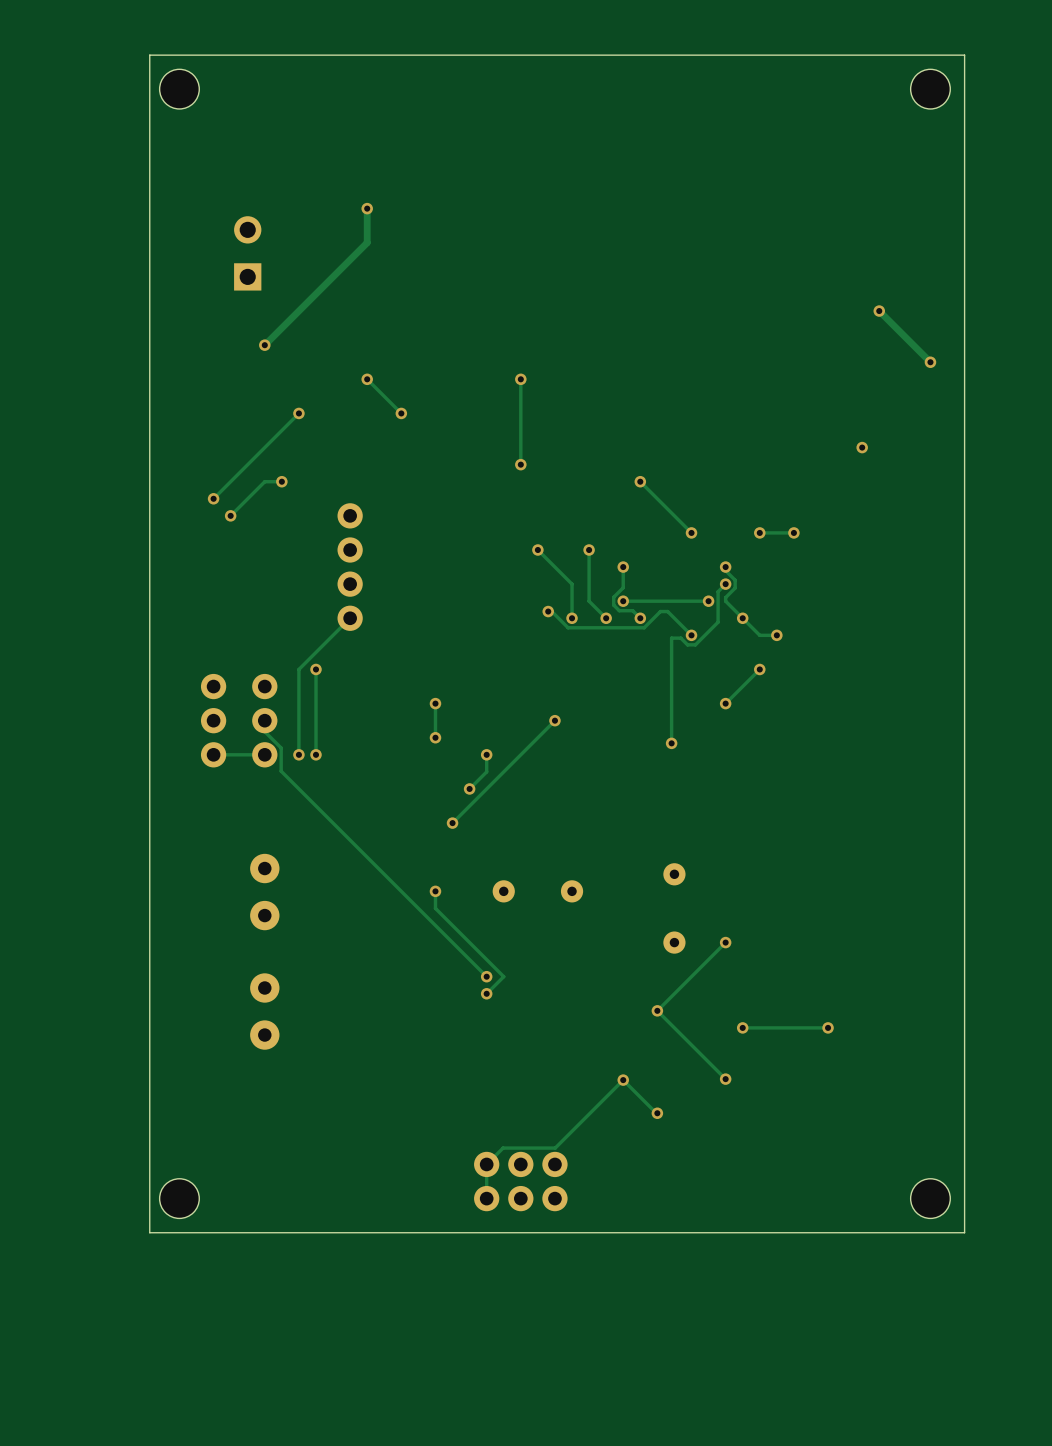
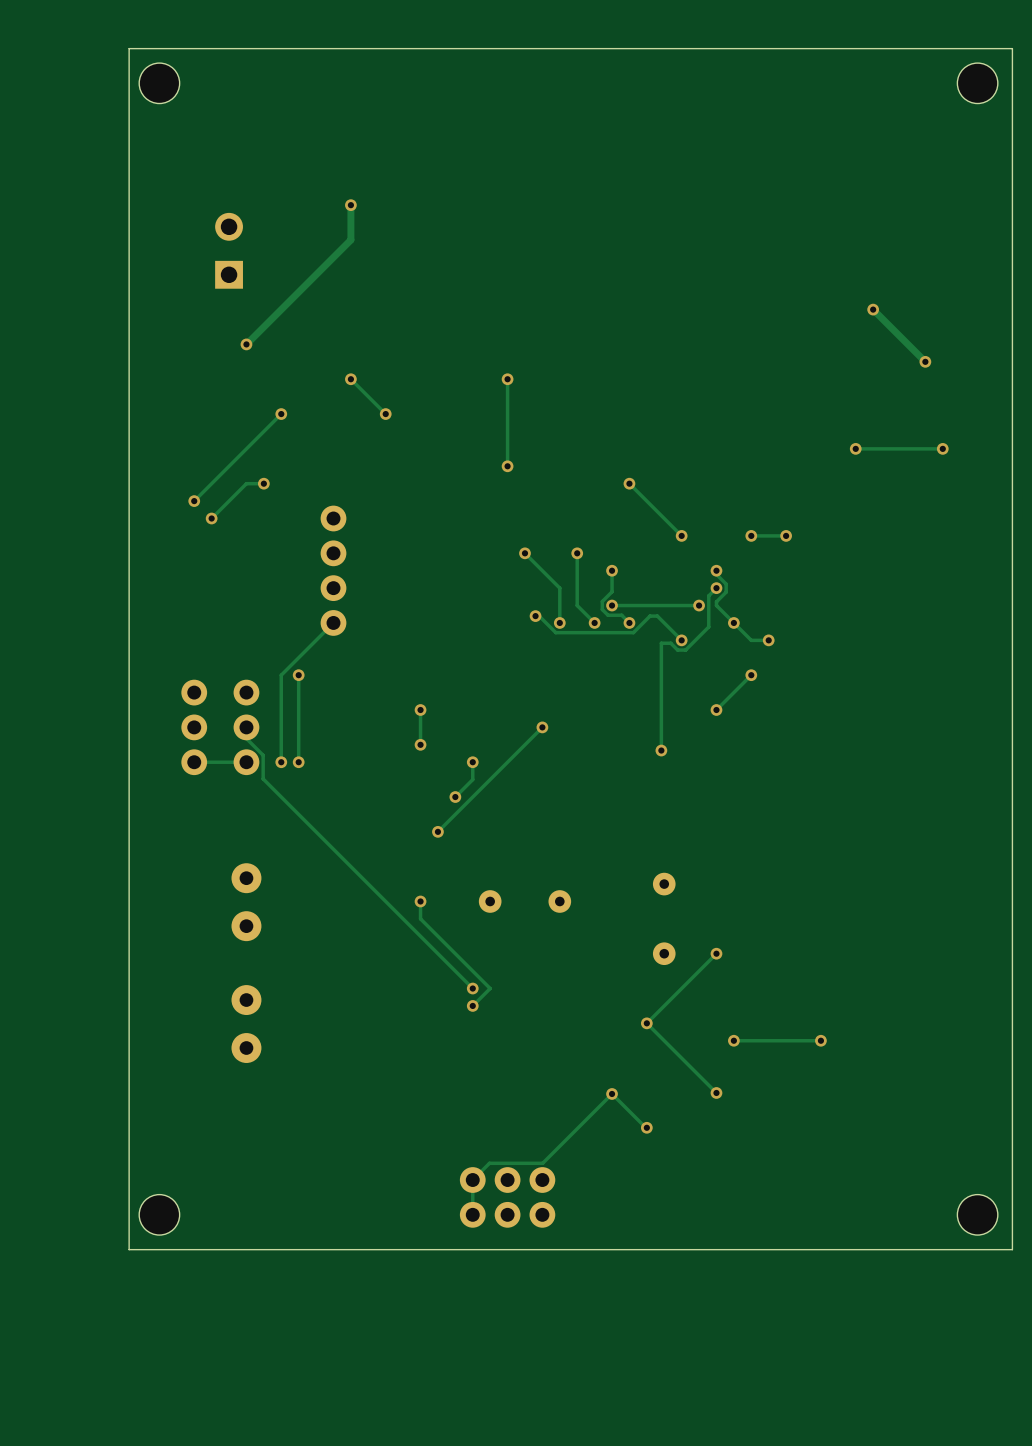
board edge: (964, 55) (964, 1232) -> (960, 48) (1012, 48) (1012, 1249) (960, 1249)
hole position: (930, 89) -> (977, 83)
track: none -> (942, 448) (855, 448)
via: none -> (942, 448)
hole position: (930, 1198) -> (977, 1214)

